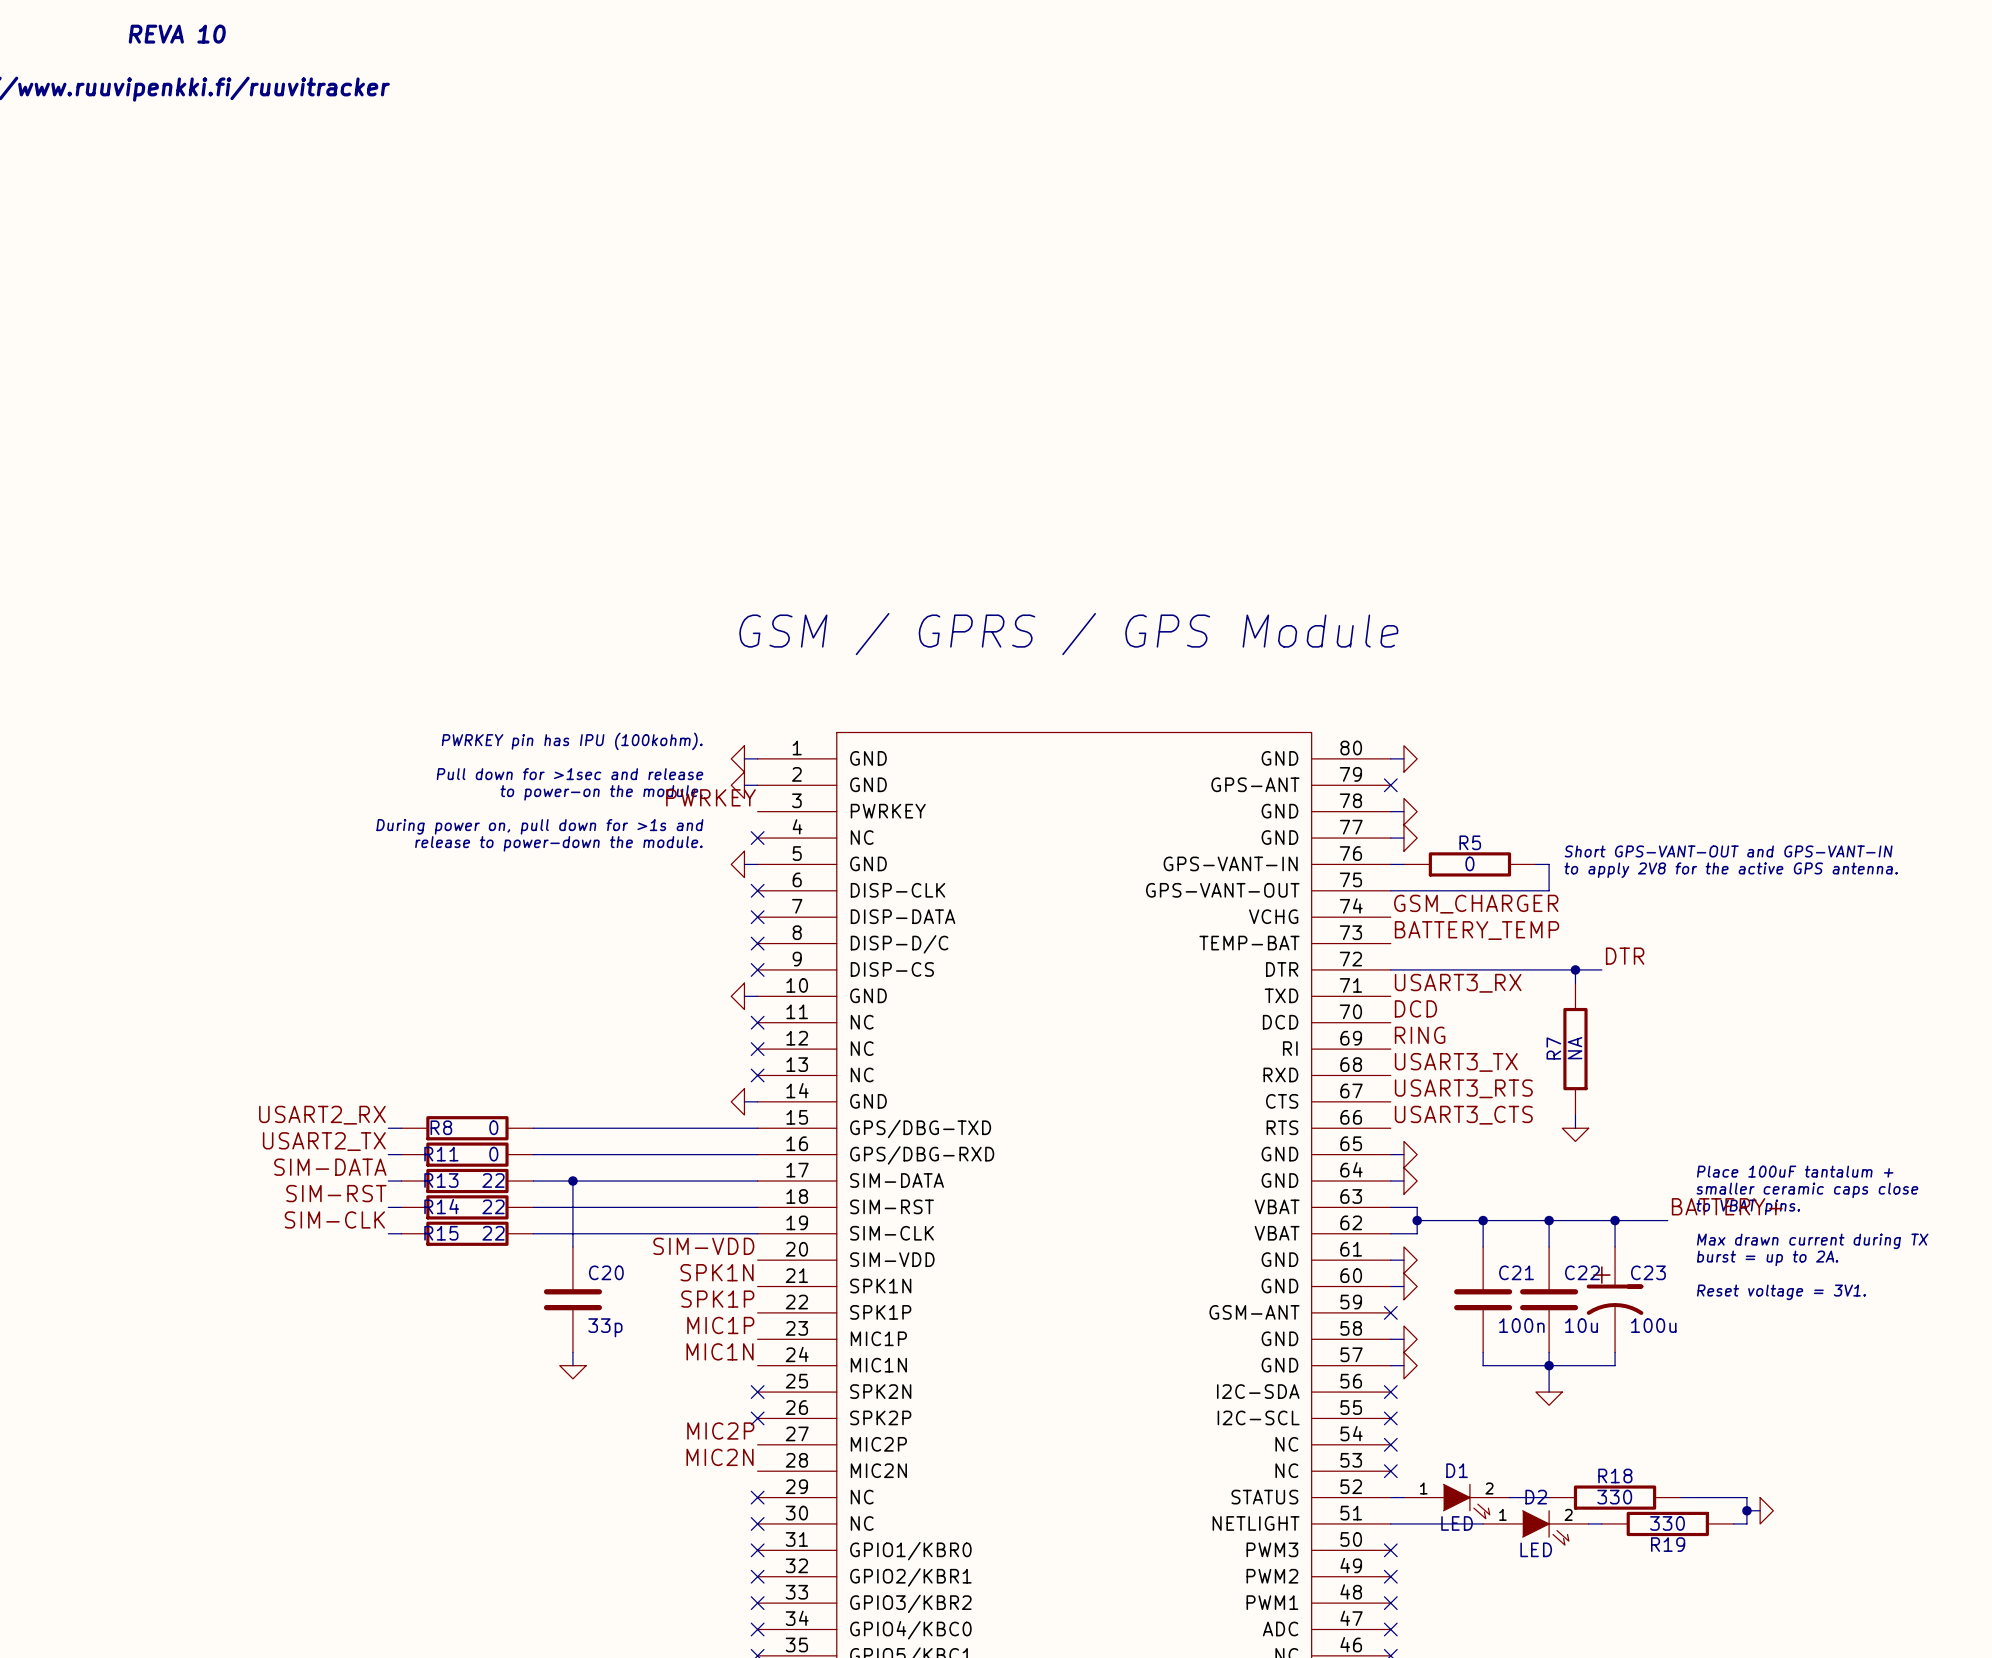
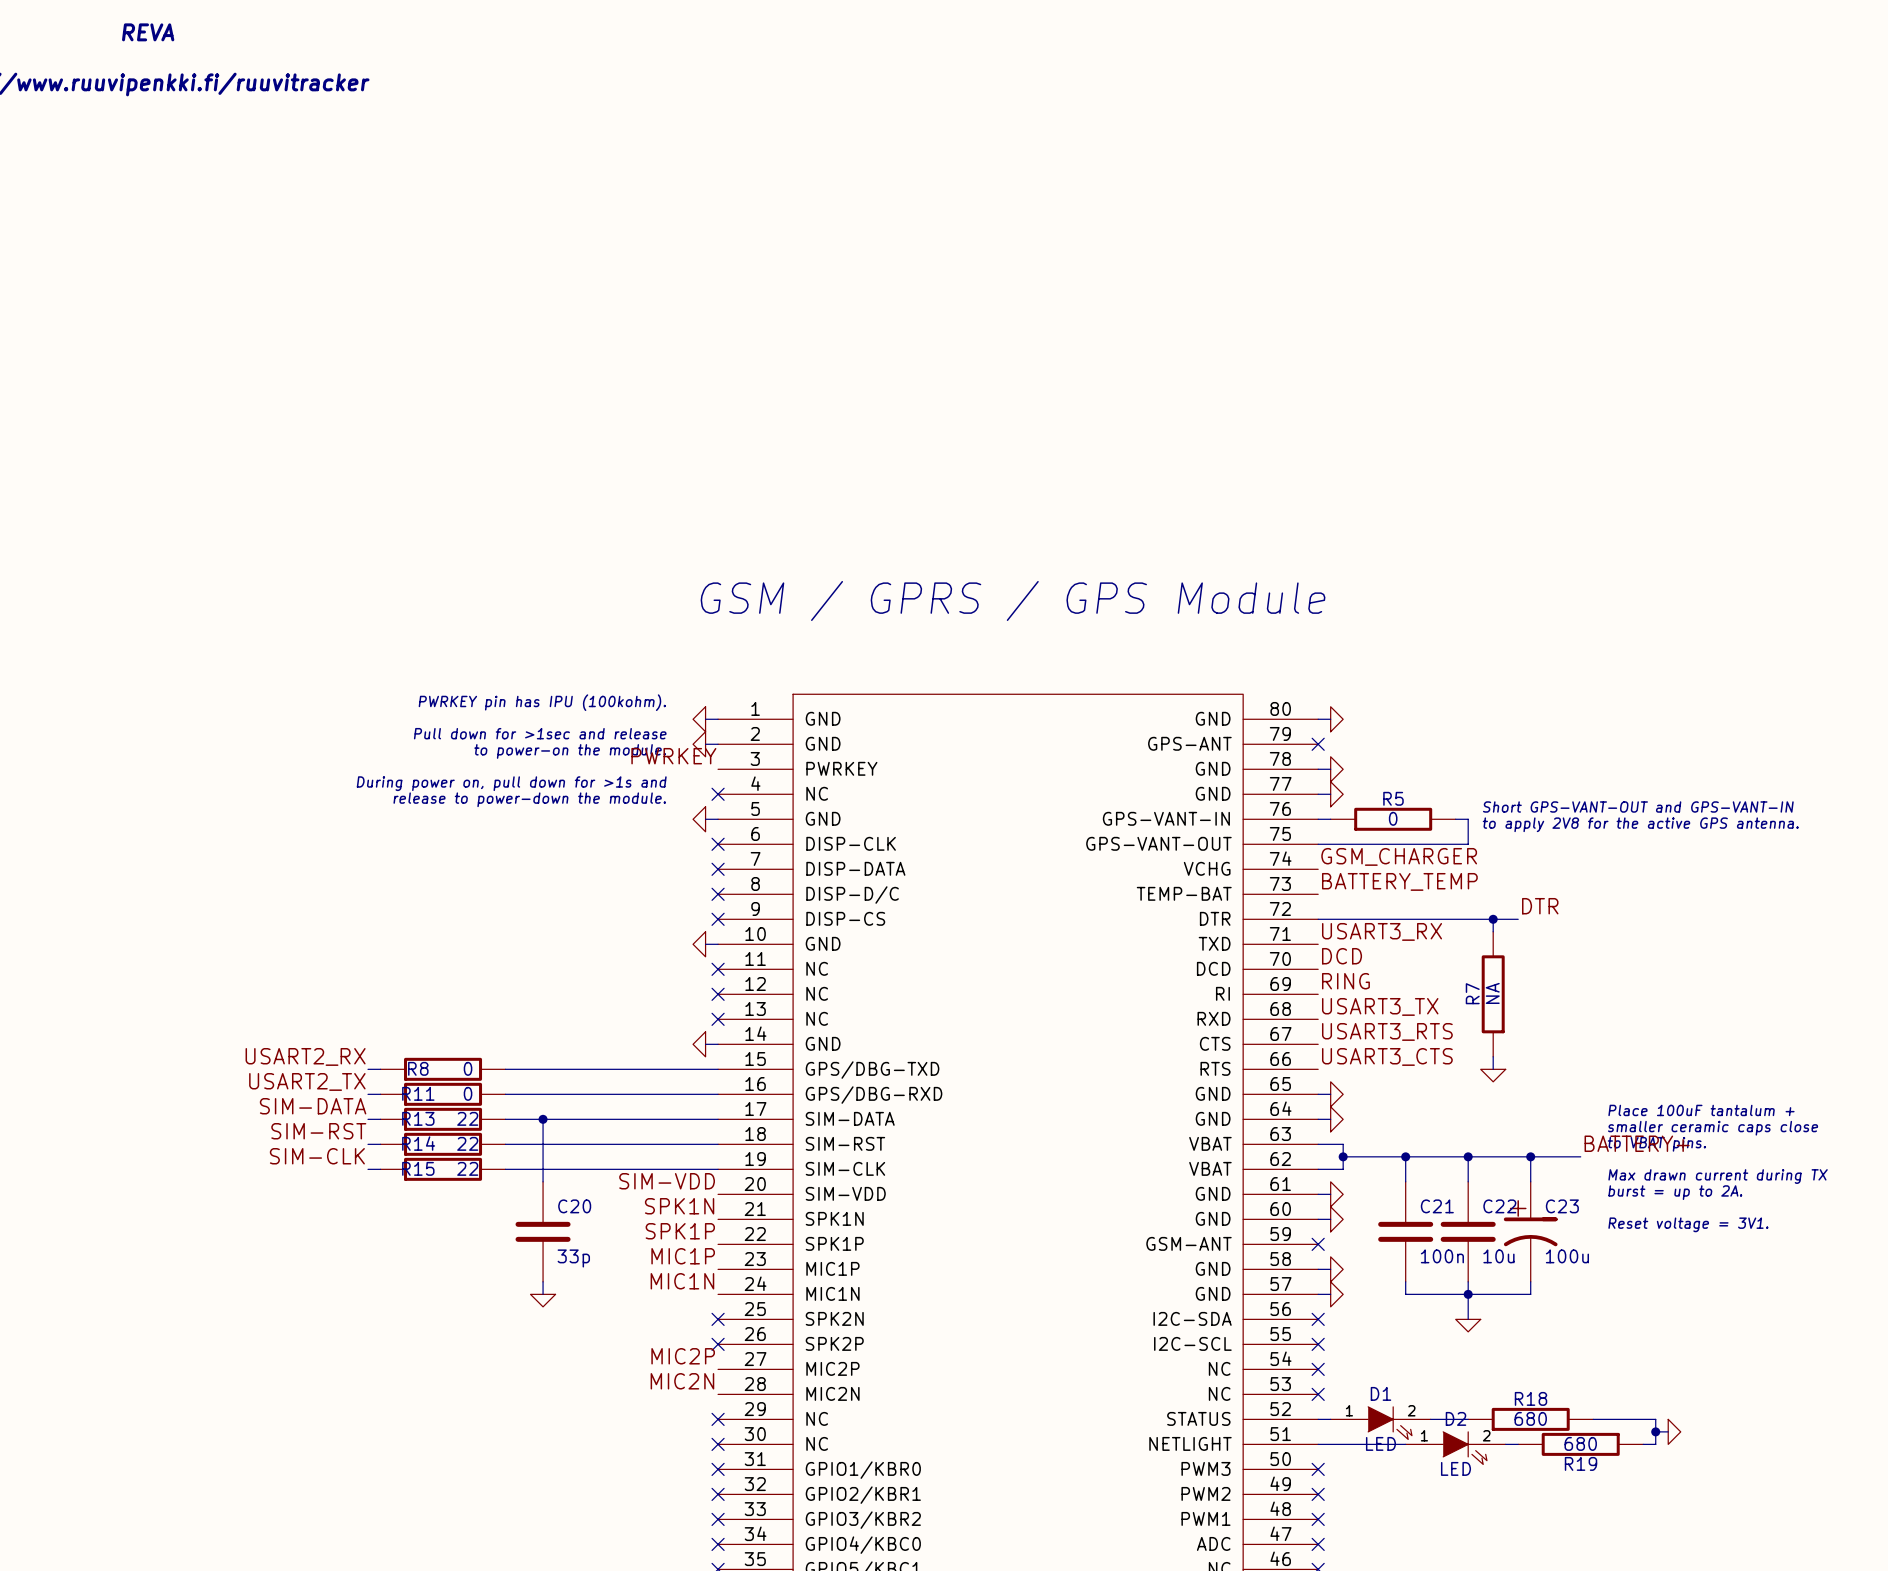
text: REVA 10 (177, 34) -> REVA (148, 32)
R18 value: 330 (1614, 1497) -> 680 (1530, 1418)
R19 value: 330 (1667, 1523) -> 680 (1580, 1443)

